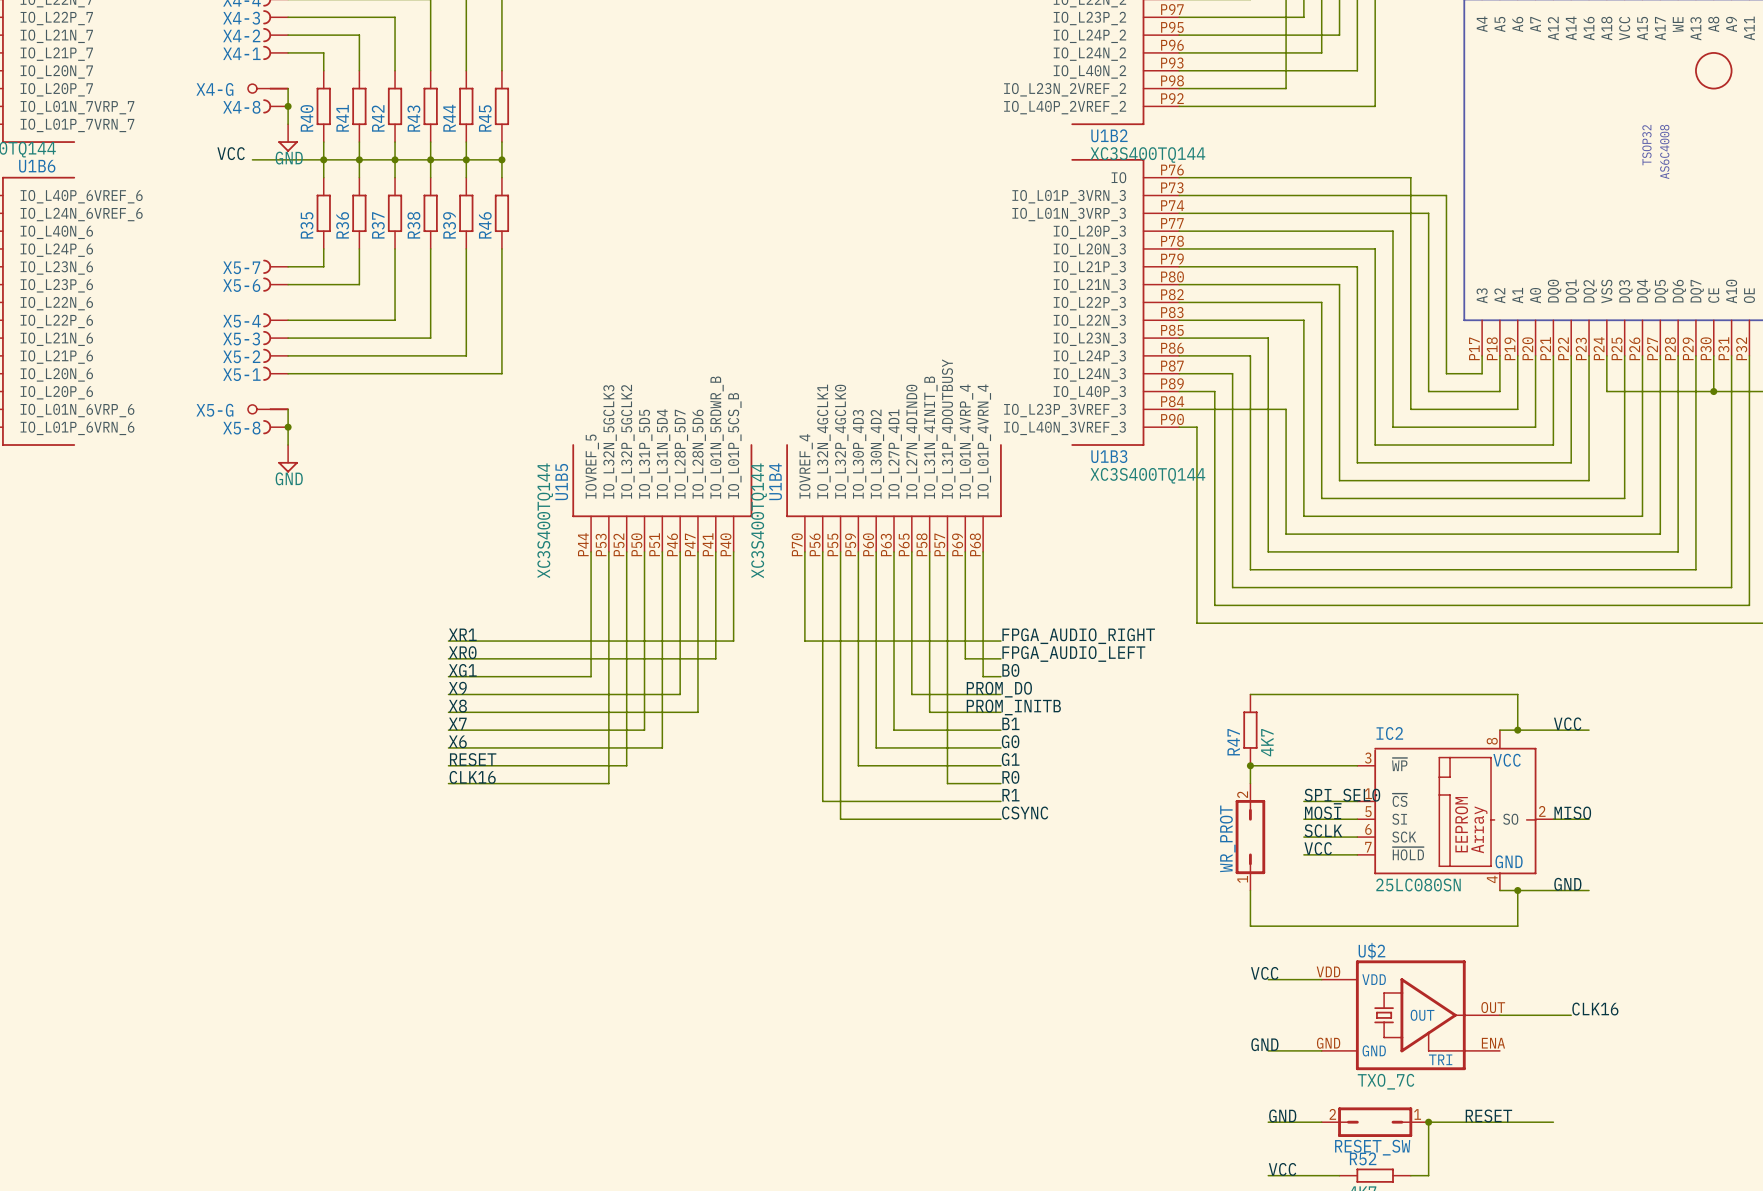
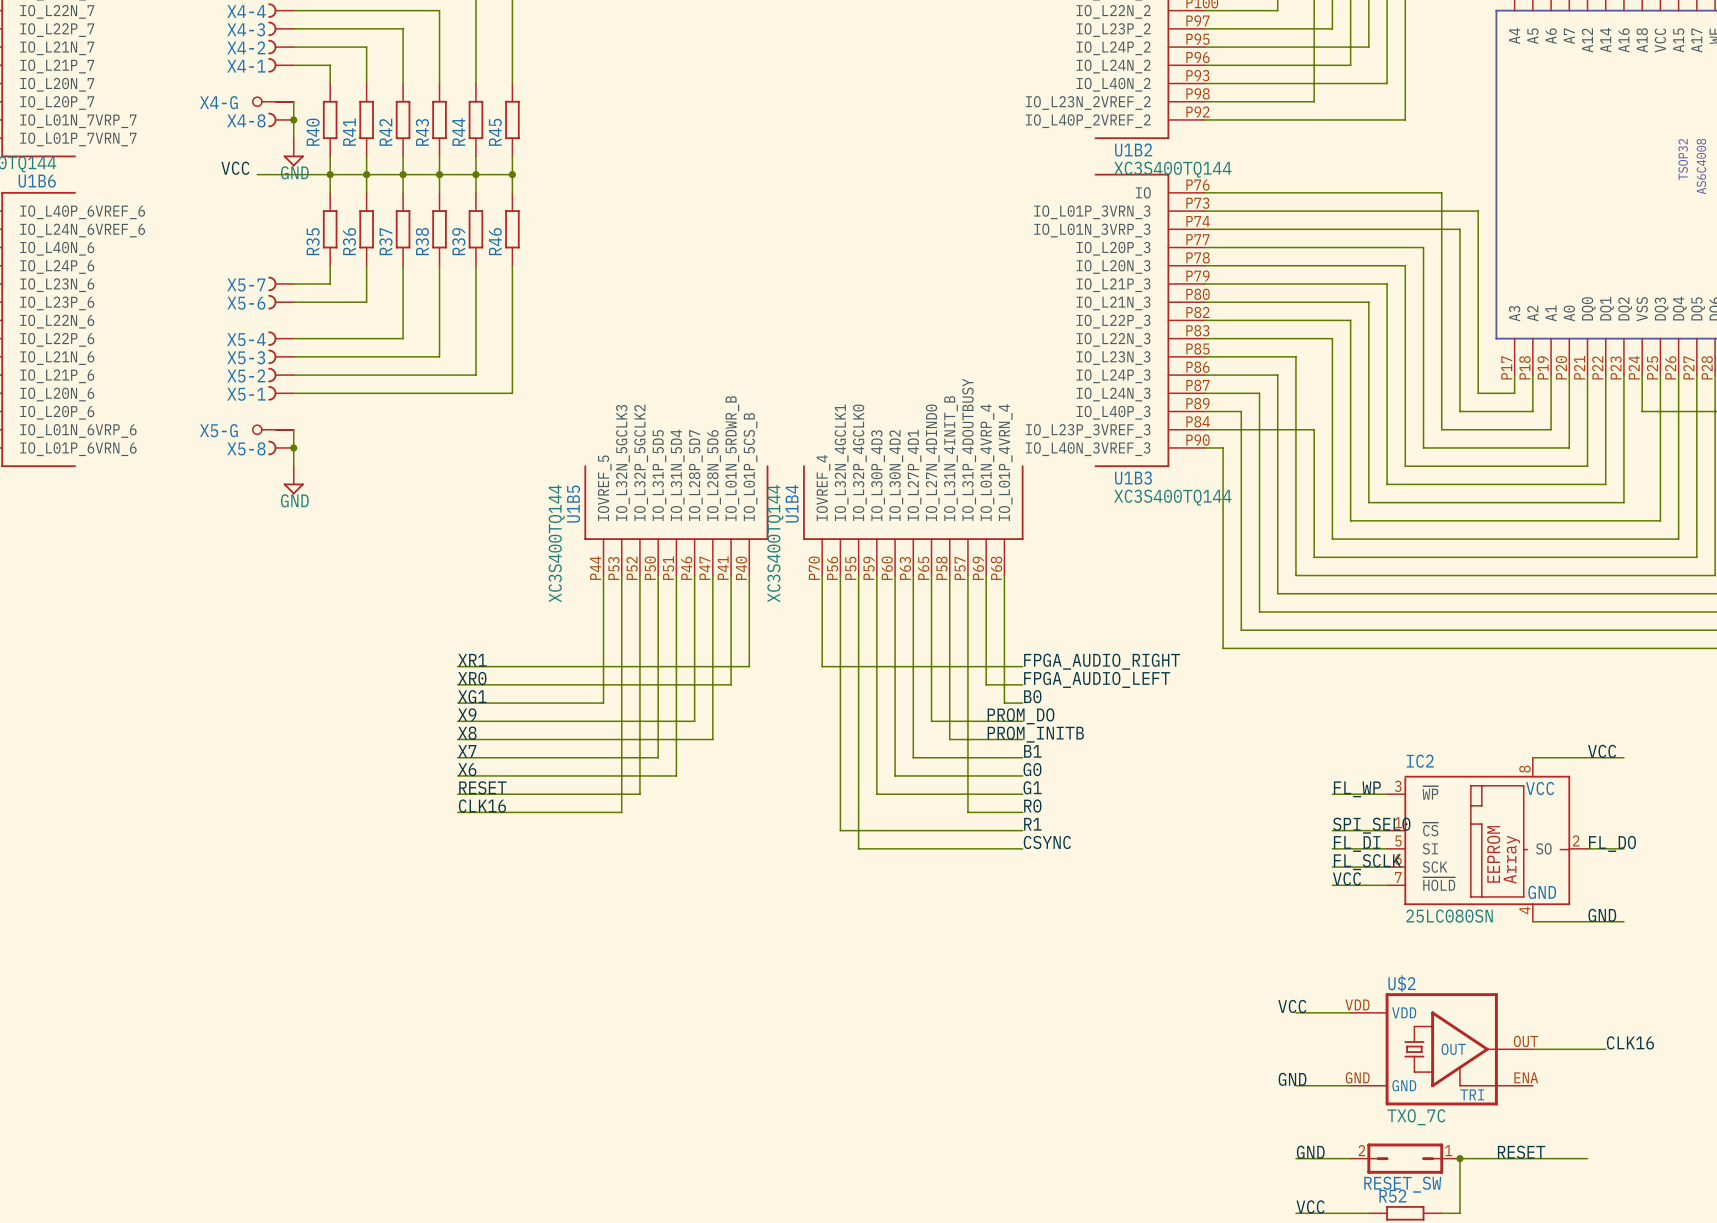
wire: (1250, 694) (1517, 694) (1517, 730) -> none
R47: 4K7 (1250, 730) -> none
junction: (1517, 730) -> none
label: none -> FL_WP (1357, 789)
junction: (1250, 765) -> none
wire: (1303, 765) (1250, 765) (1250, 783) -> none
label: MOSI (1323, 813) -> FL_DI (1357, 844)
label: MISO (1572, 813) -> FL_DO (1612, 843)
label: SCLK (1323, 830) -> FL_SCLK (1367, 862)
WR_PROT: (1250, 837) -> none
wire: (1250, 890) (1250, 926) (1517, 926) (1517, 890) -> none
junction: (1517, 890) -> none

